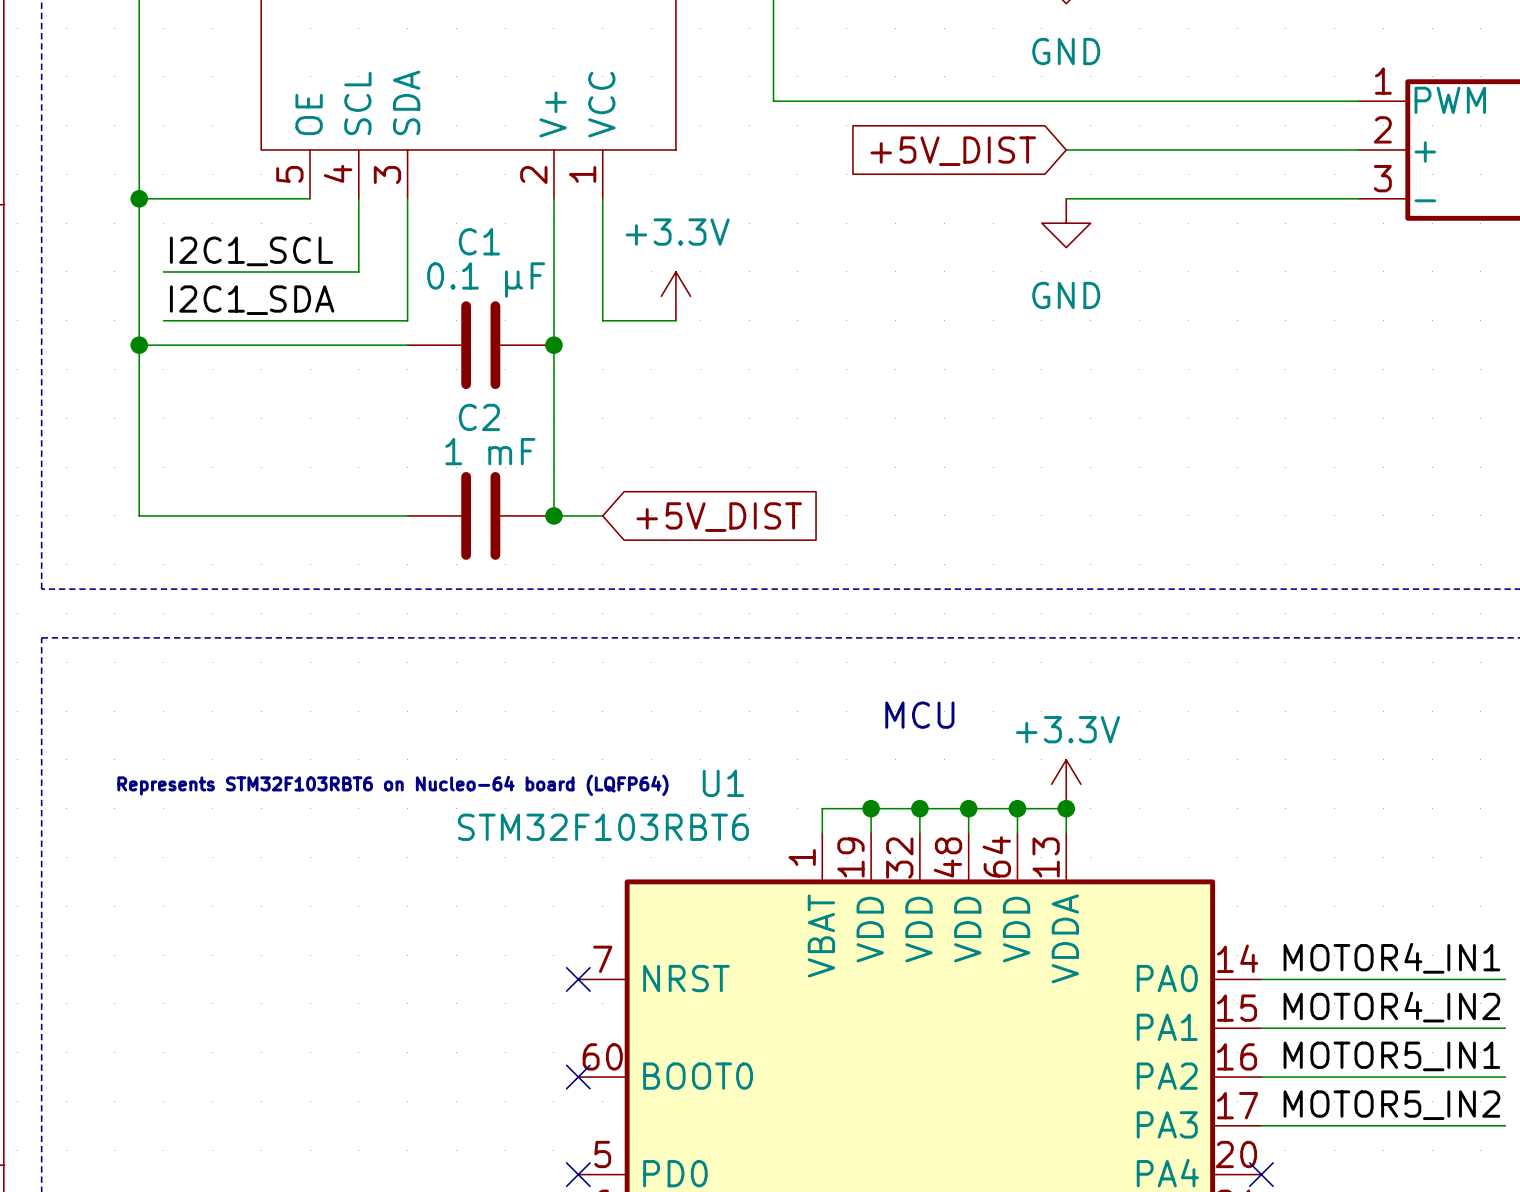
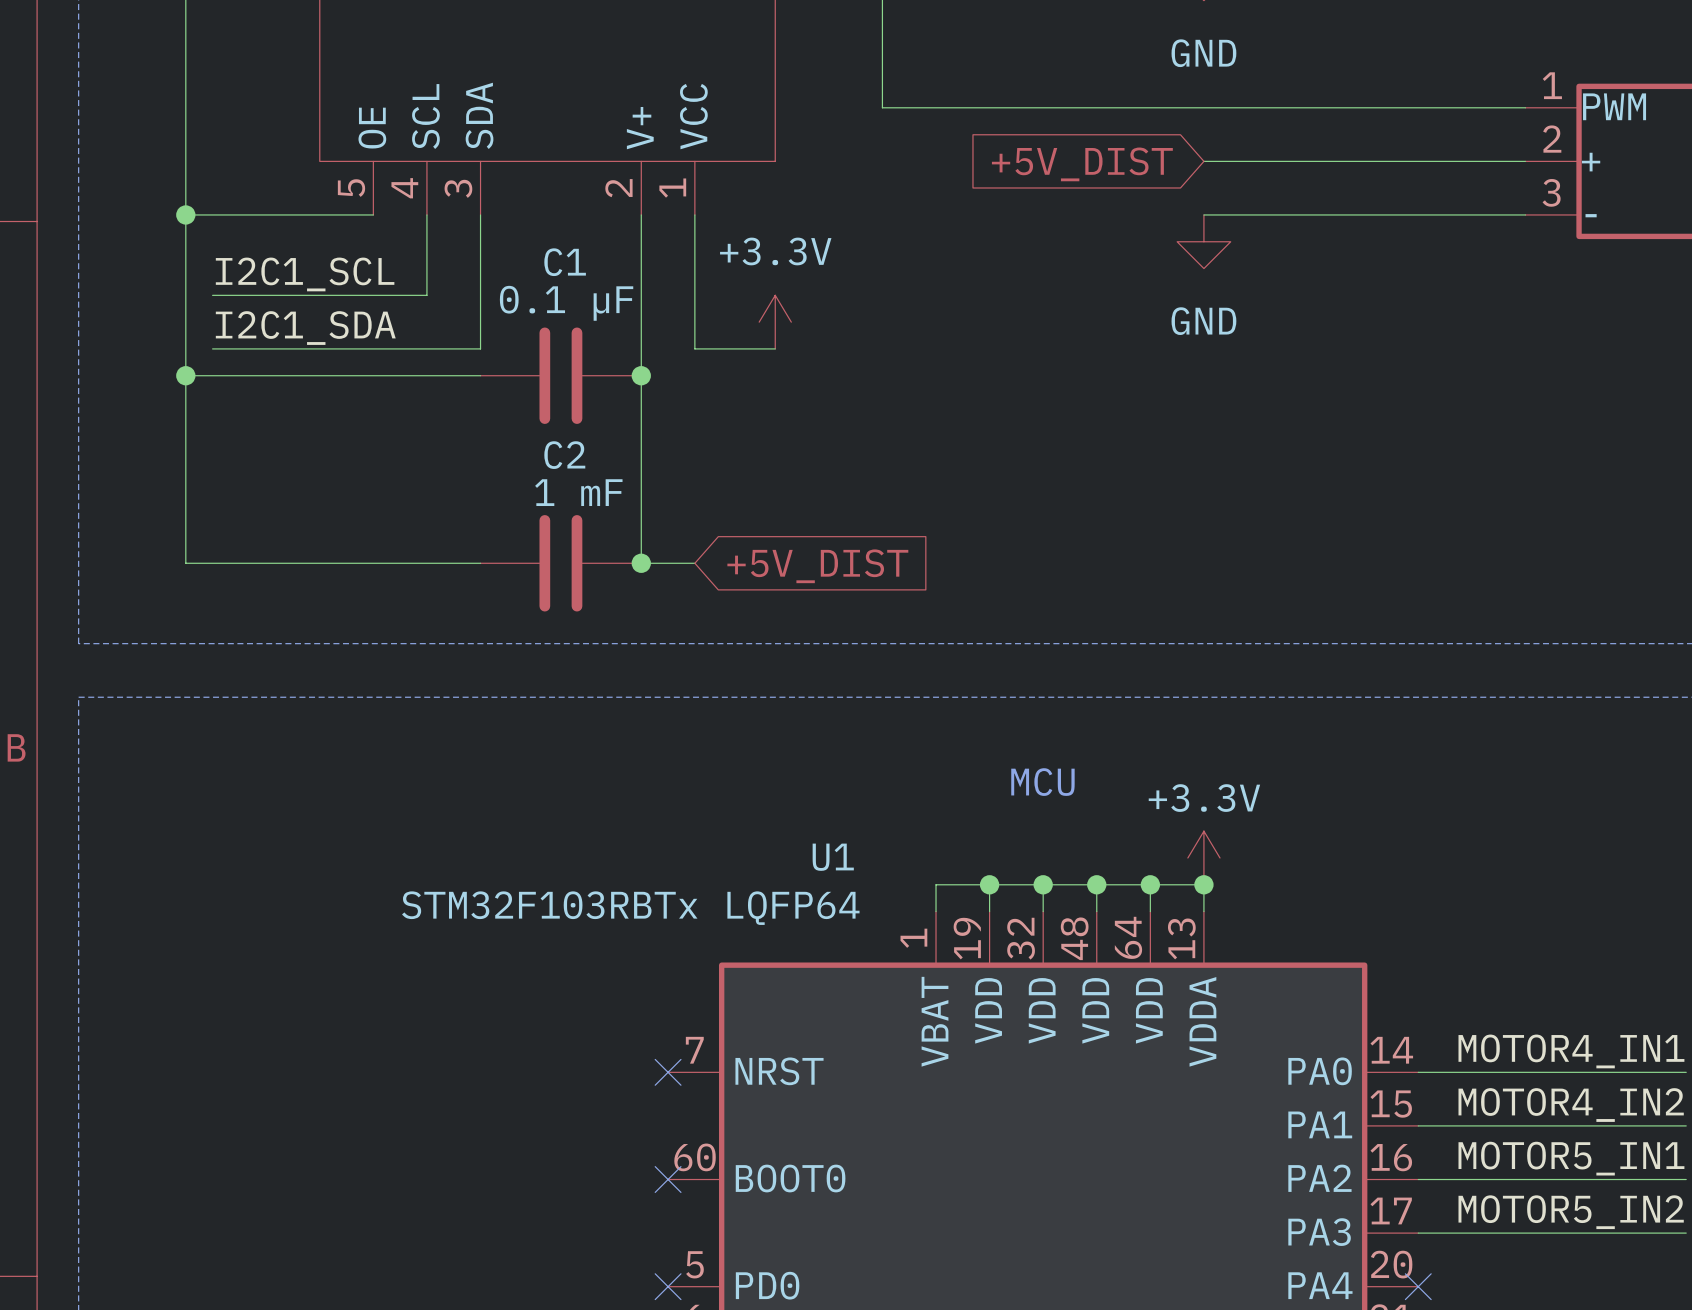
text: Represents STM32F103RBT6 on Nucleo-64 board (LQFP64) (392, 785) -> none
U1 value: STM32F103RBT6 (603, 827) -> STM32F103RBTx LQFP64 (630, 908)

